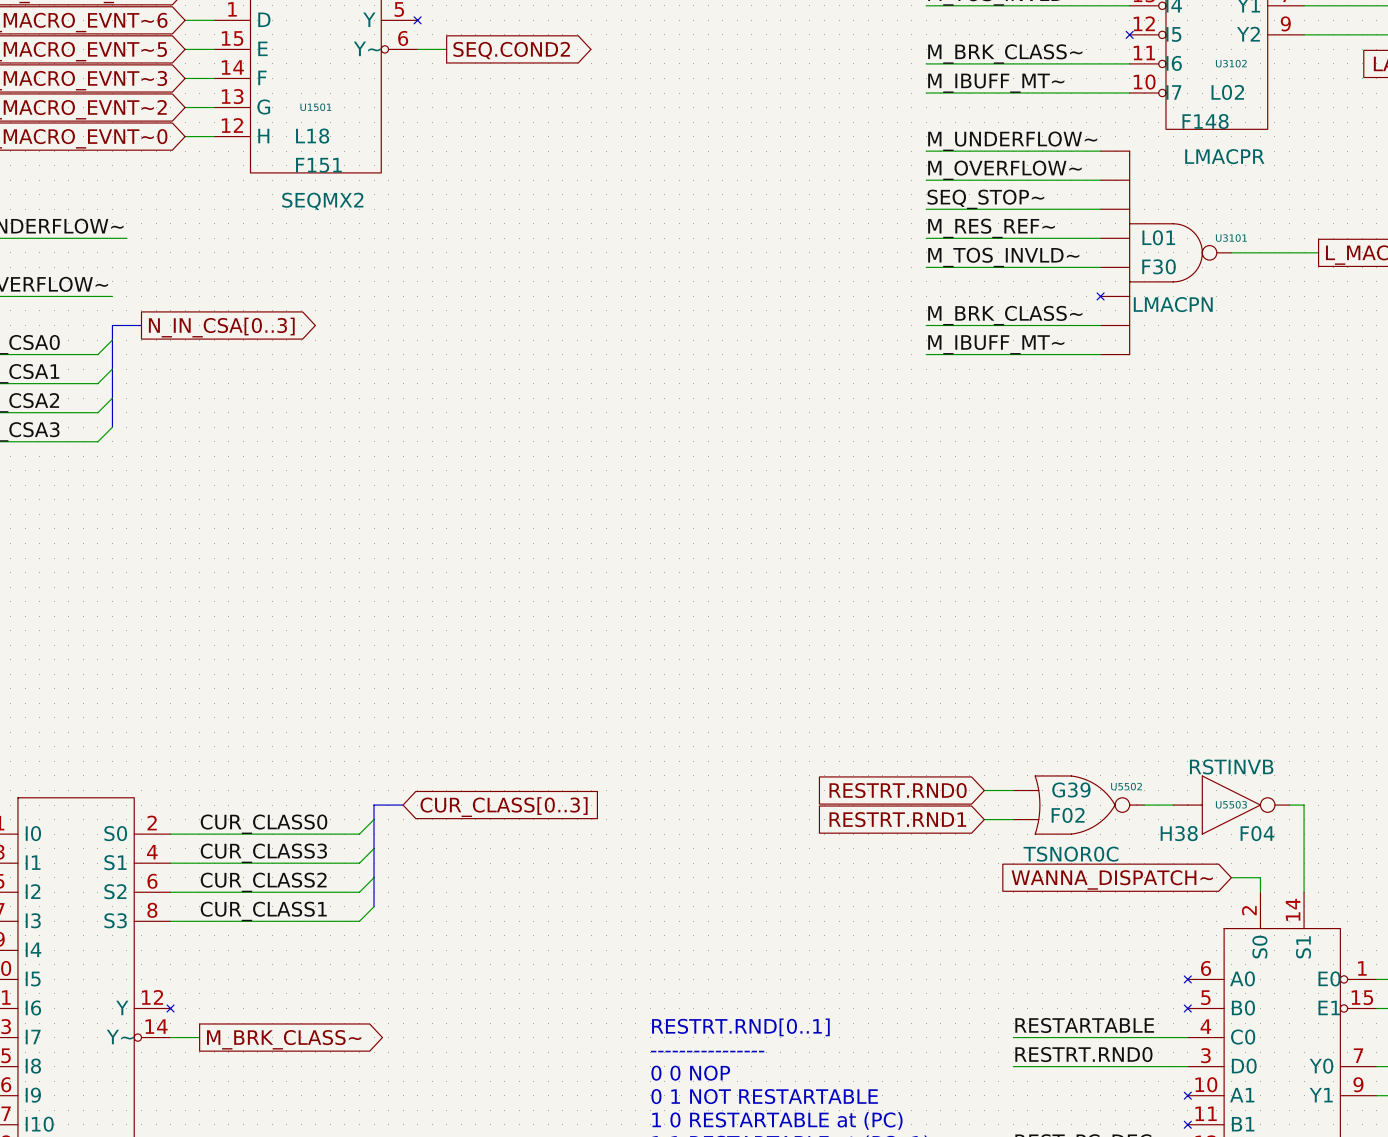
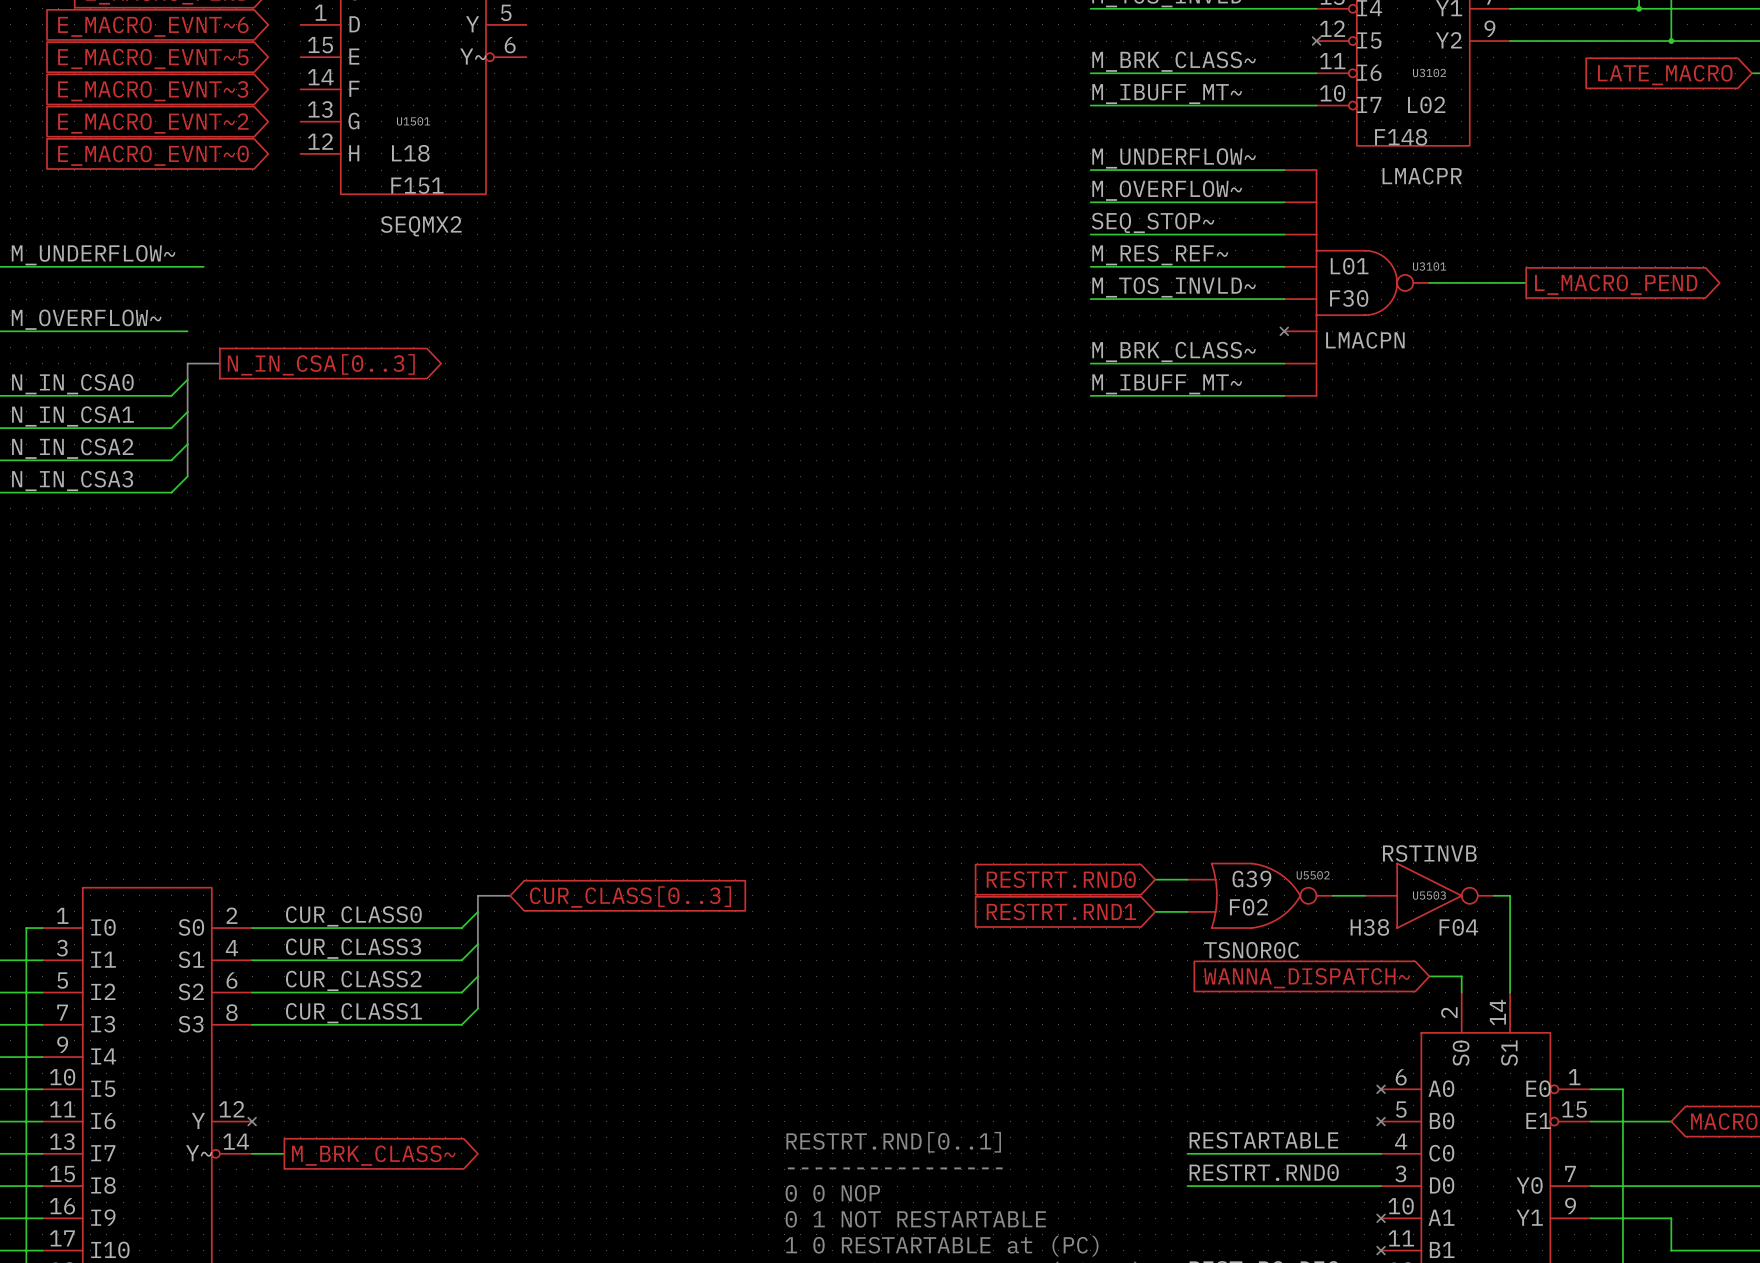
wire: (185, 20) (214, 20) -> none
no-connect mark: (417, 20) -> none
wire: (185, 49) (214, 49) -> none
wire: (417, 49) (446, 49) -> none
global label: SEQ.COND2 (511, 50) -> none
wire: (185, 78) (214, 78) -> none
wire: (185, 107) (214, 107) -> none
wire: (185, 136) (214, 136) -> none

